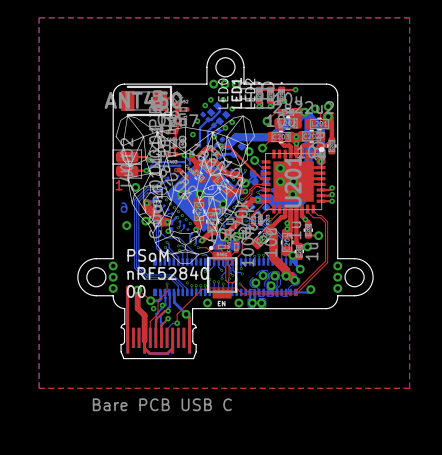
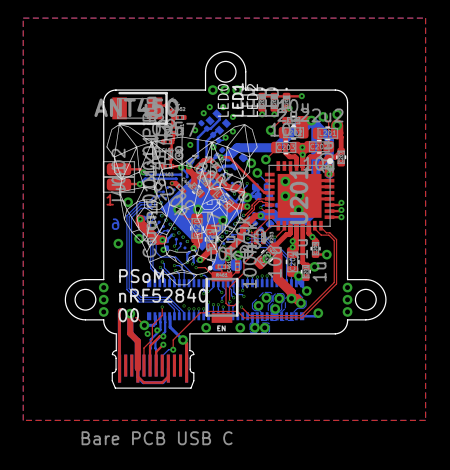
bottom track: none -> (191, 160) (189, 166)

